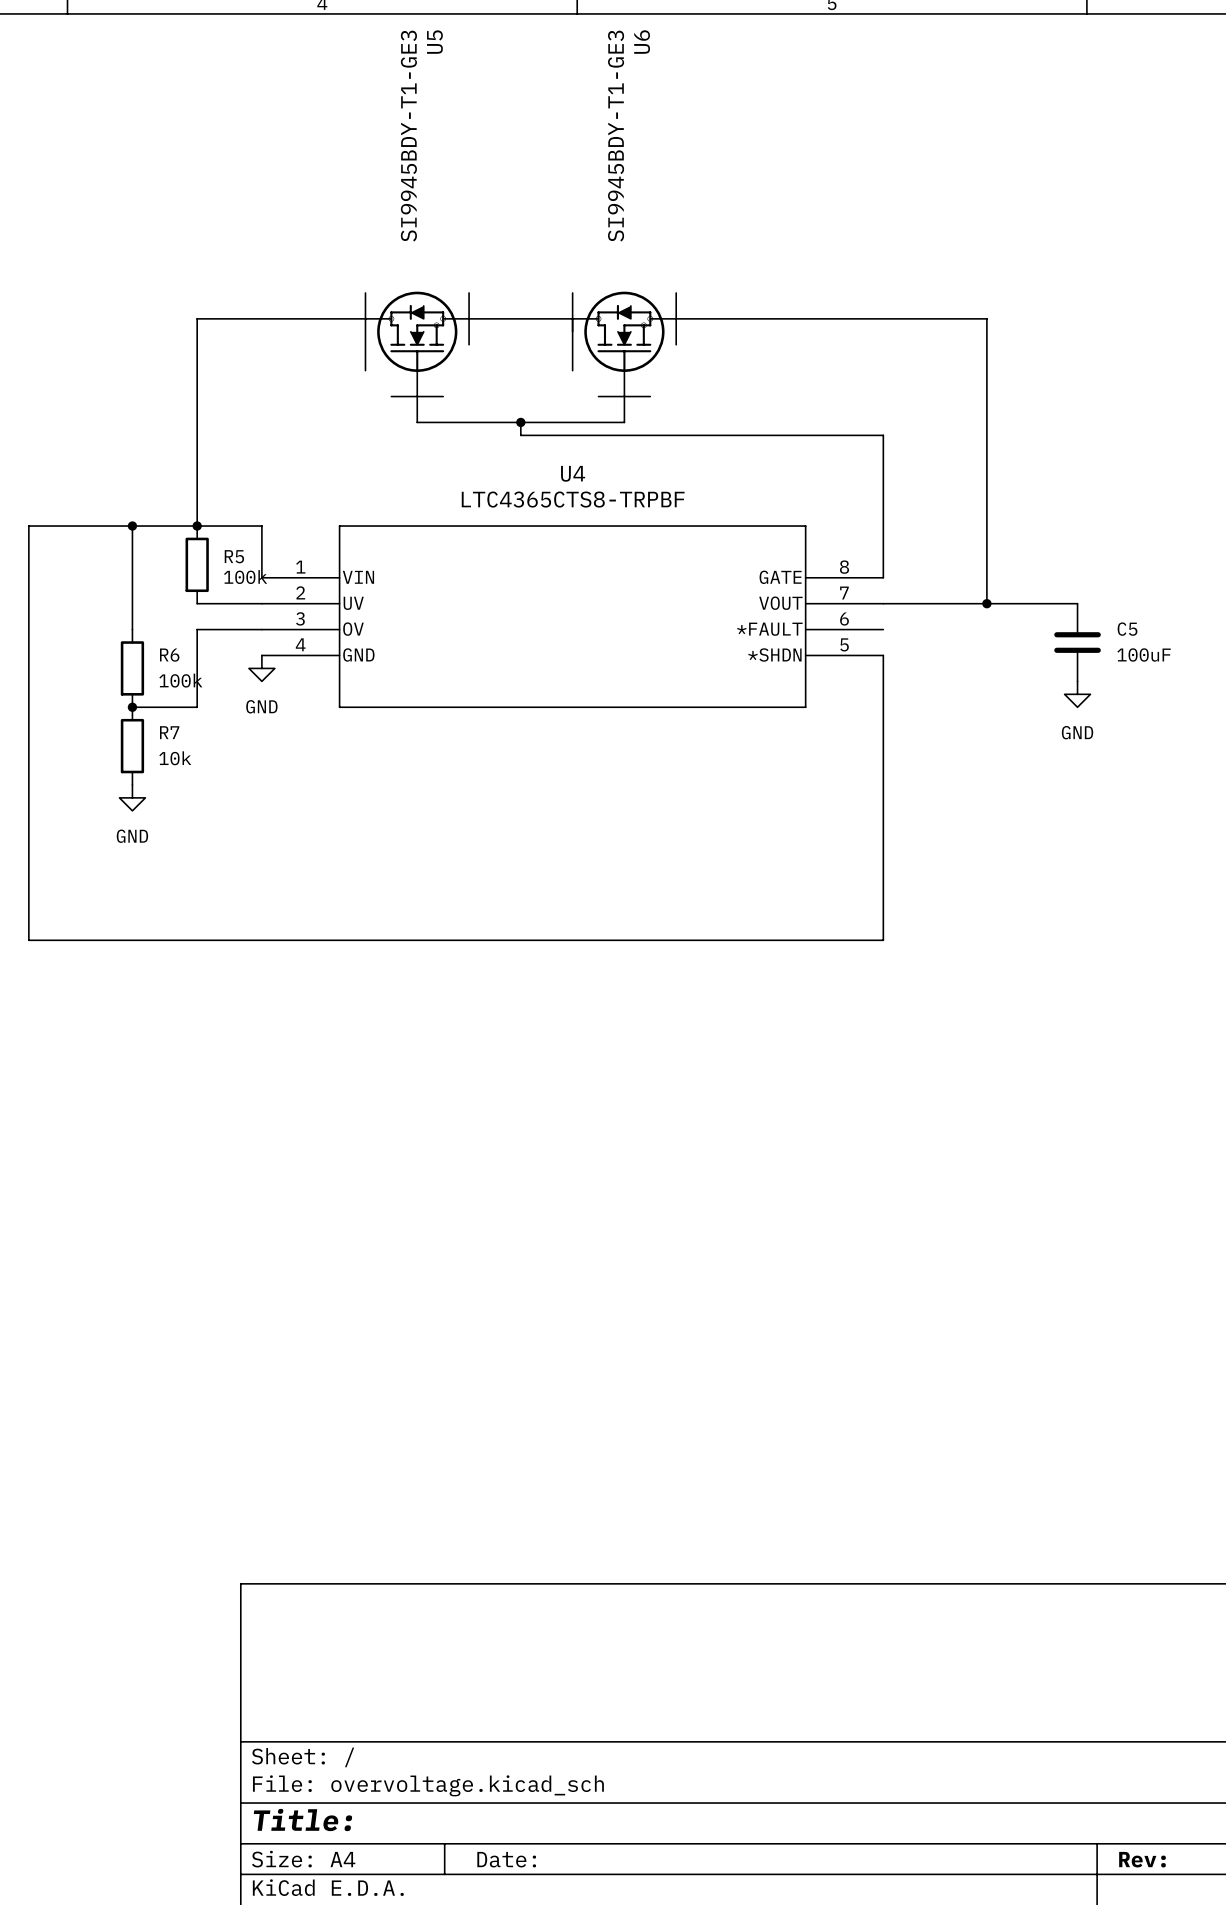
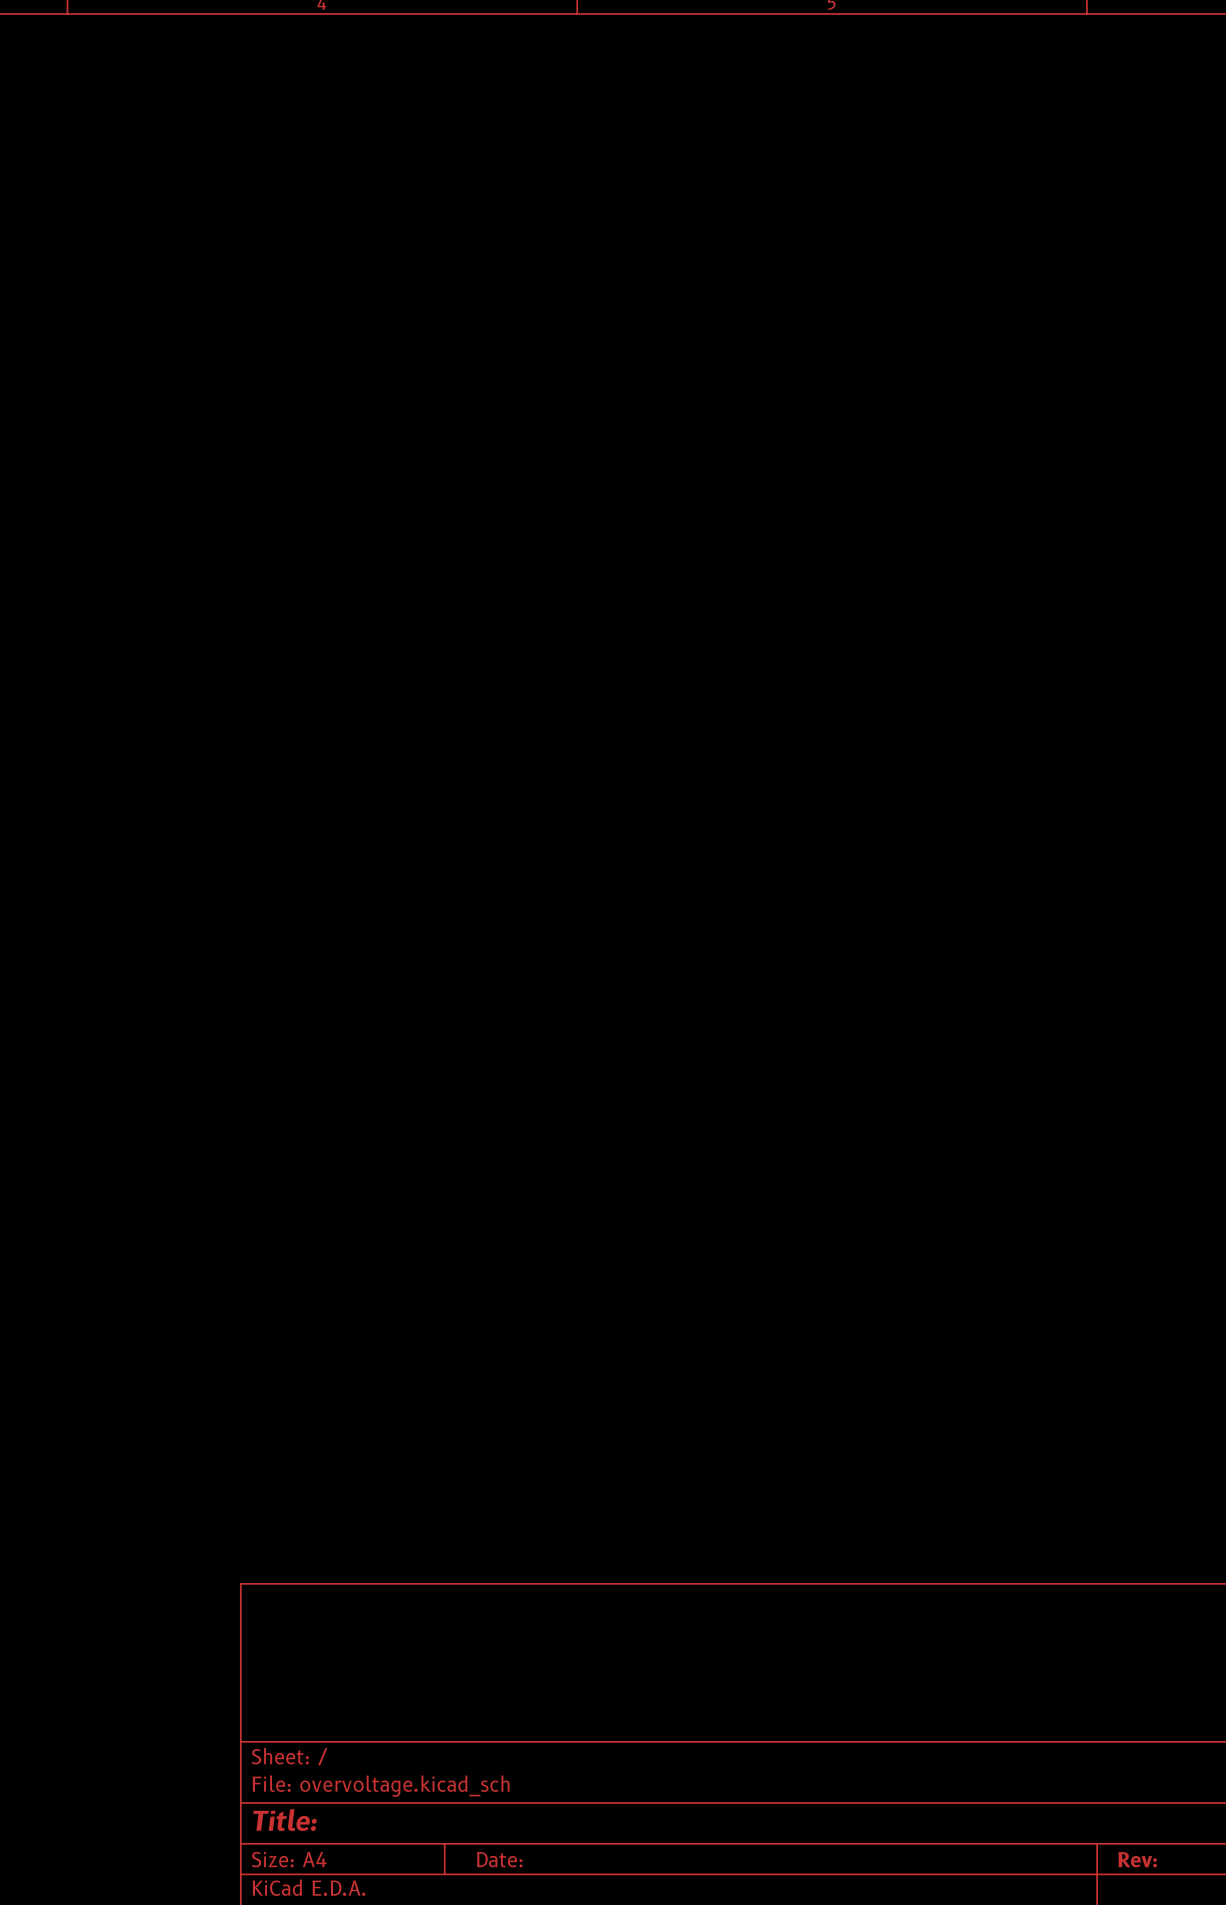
wire: (365, 318) (197, 318) (197, 526) -> none
wire: (469, 318) (572, 318) (572, 331) -> none
wire: (676, 318) (986, 318) (986, 603) -> none
U5: SI9945BDY-T1-GE3 (417, 344) -> none
U6: SI9945BDY-T1-GE3 (624, 344) -> none
wire: (417, 396) (417, 422) (624, 422) (624, 396) -> none
wire: (520, 422) (520, 435) (883, 435) (883, 577) -> none
junction: (520, 422) -> none
wire: (132, 526) (132, 629) -> none
junction: (132, 526) -> none
junction: (197, 526) -> none
R5: 100k (197, 564) -> none
wire: (261, 577) (261, 526) (28, 526) (28, 940) (883, 940) (883, 655) -> none
wire: (197, 603) (261, 603) -> none
wire: (883, 603) (1077, 603) -> none
junction: (986, 603) -> none
U4: LTC4365CTS8-TRPBF (572, 616) -> none
wire: (261, 629) (197, 629) (197, 707) (132, 707) -> none
C5: 100uF (1077, 642) -> none
R6: 100k (132, 668) -> none
power symbol: GND (261, 668) -> none
power symbol: GND (1077, 694) -> none
junction: (132, 707) -> none
R7: 10k (132, 746) -> none
power symbol: GND (132, 797) -> none

